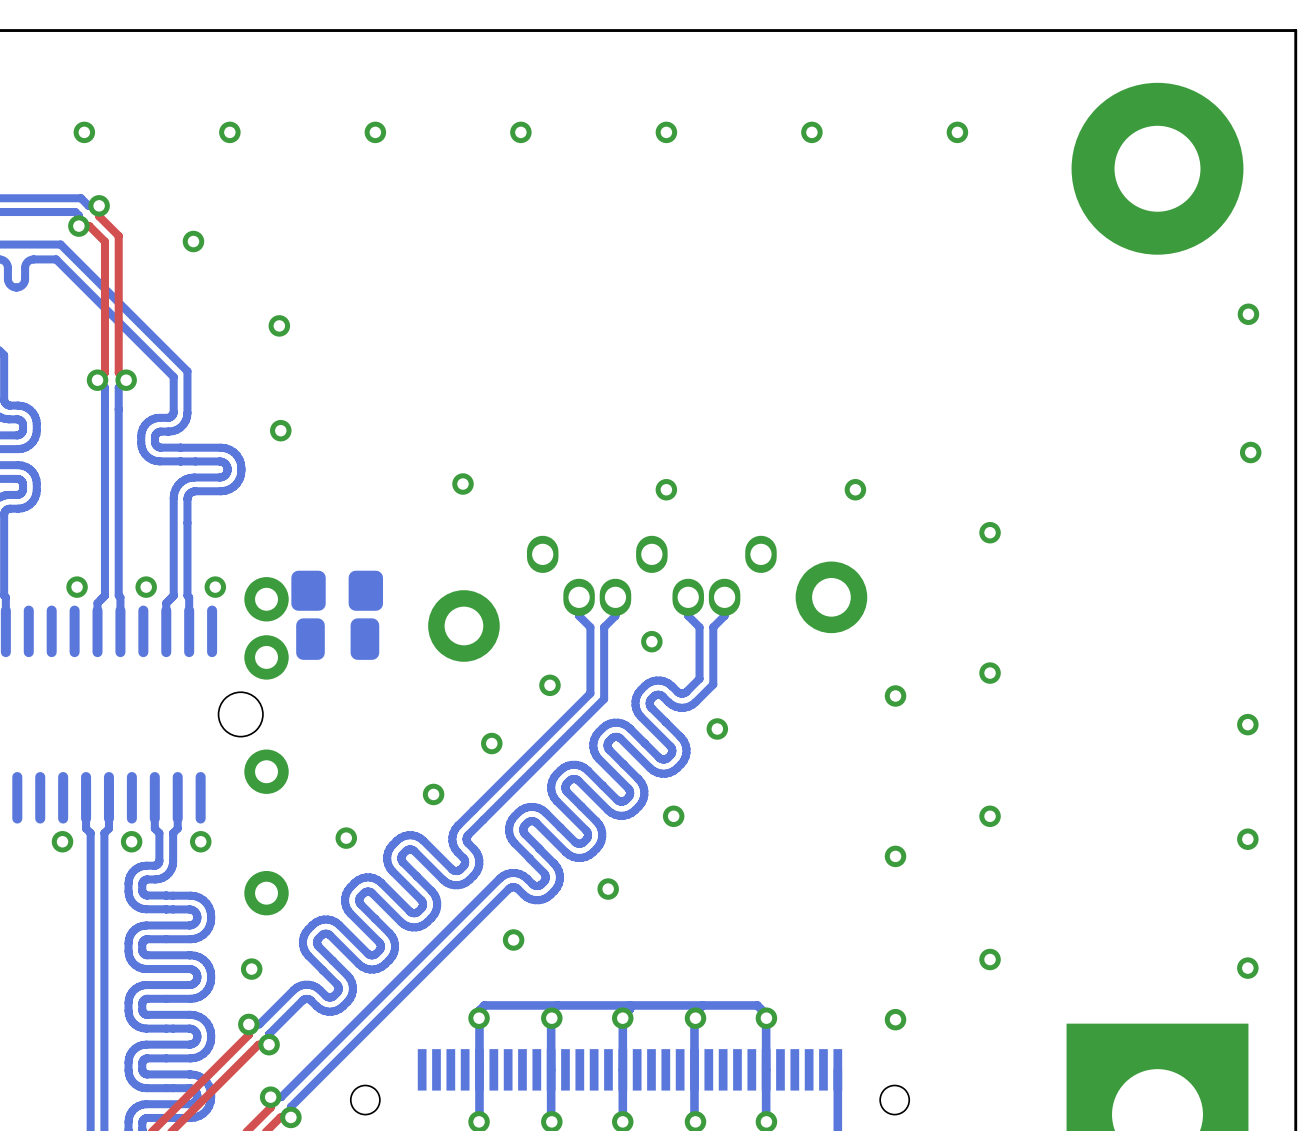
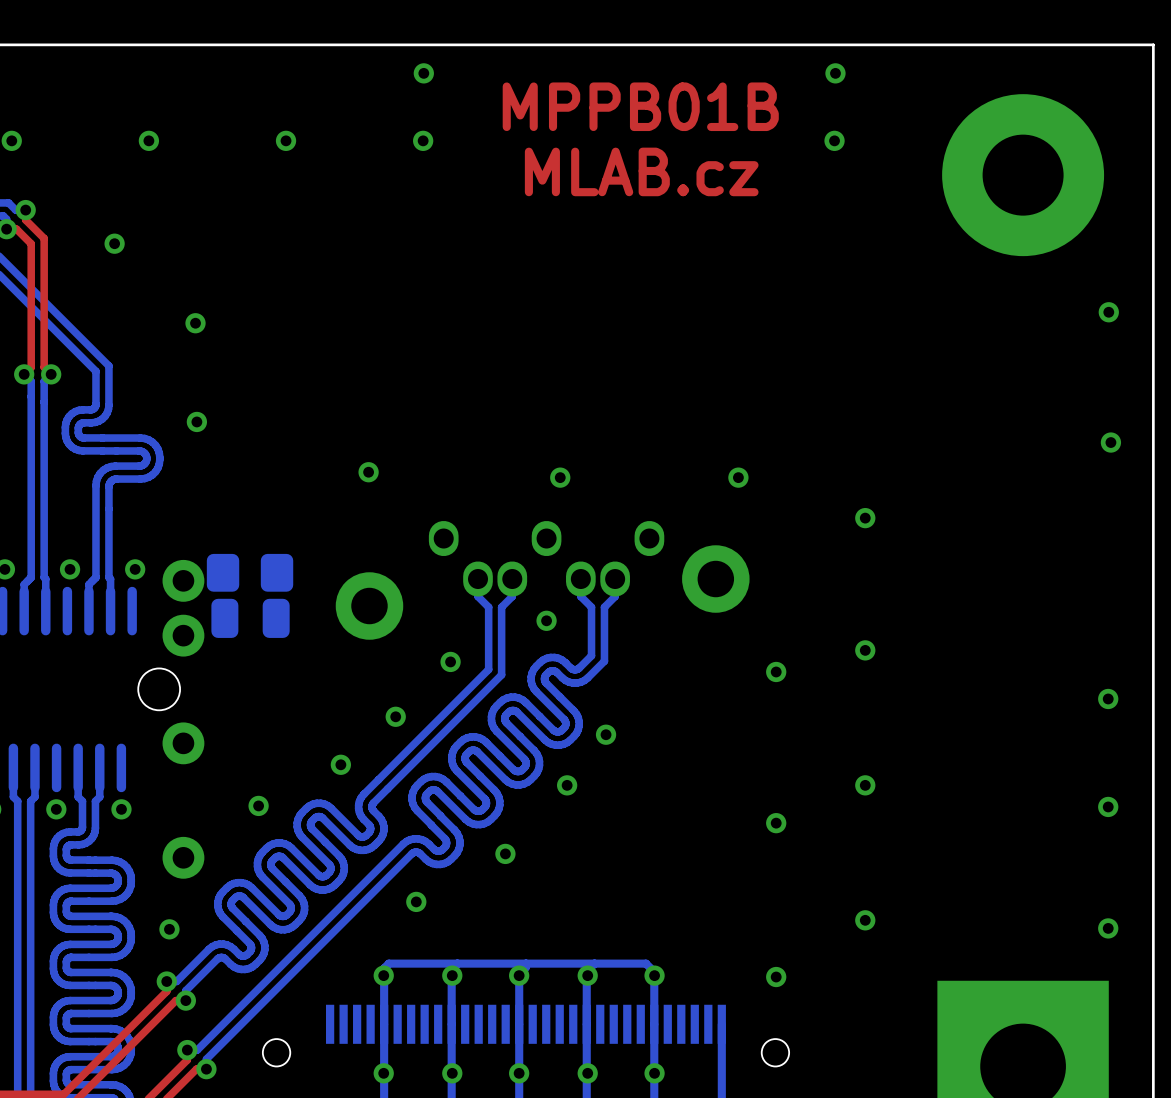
via: none -> (423, 73)
via: none -> (835, 73)
text: none -> MPPB01B (640, 106)
via: (666, 132) -> none
via: (811, 132) -> none
text: none -> MLAB.cz (641, 171)
via position: (717, 728) -> (606, 734)

